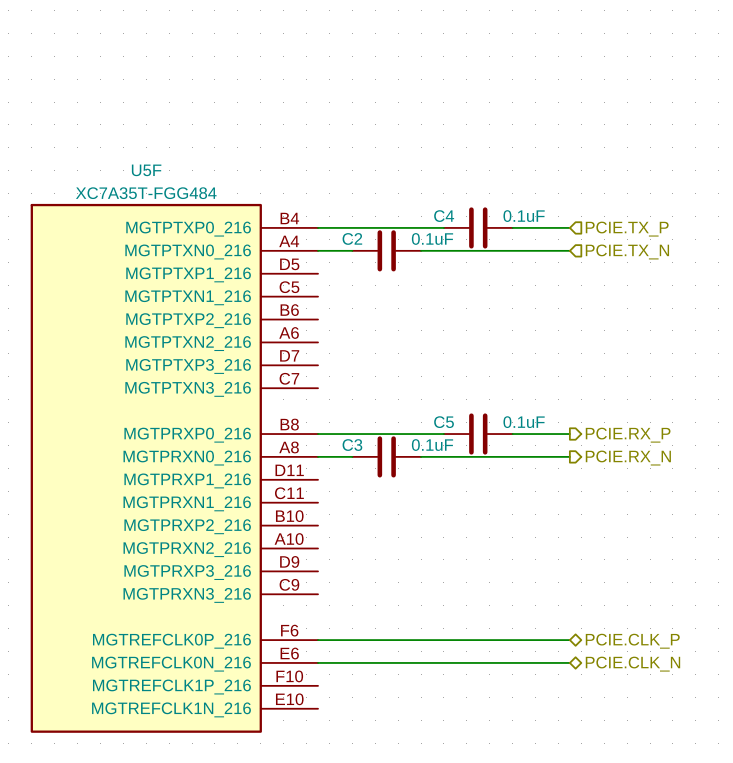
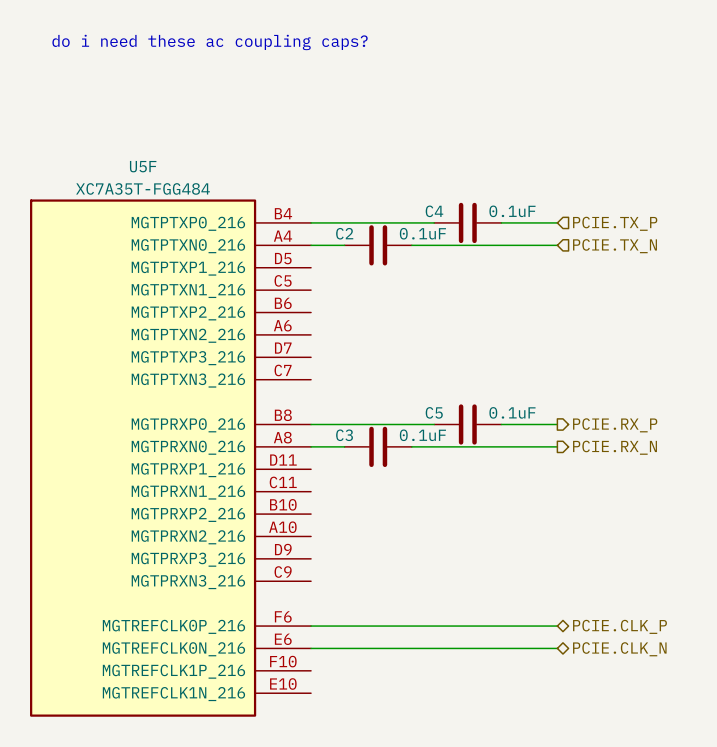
text: none -> do i need these ac coupling caps? (210, 42)

